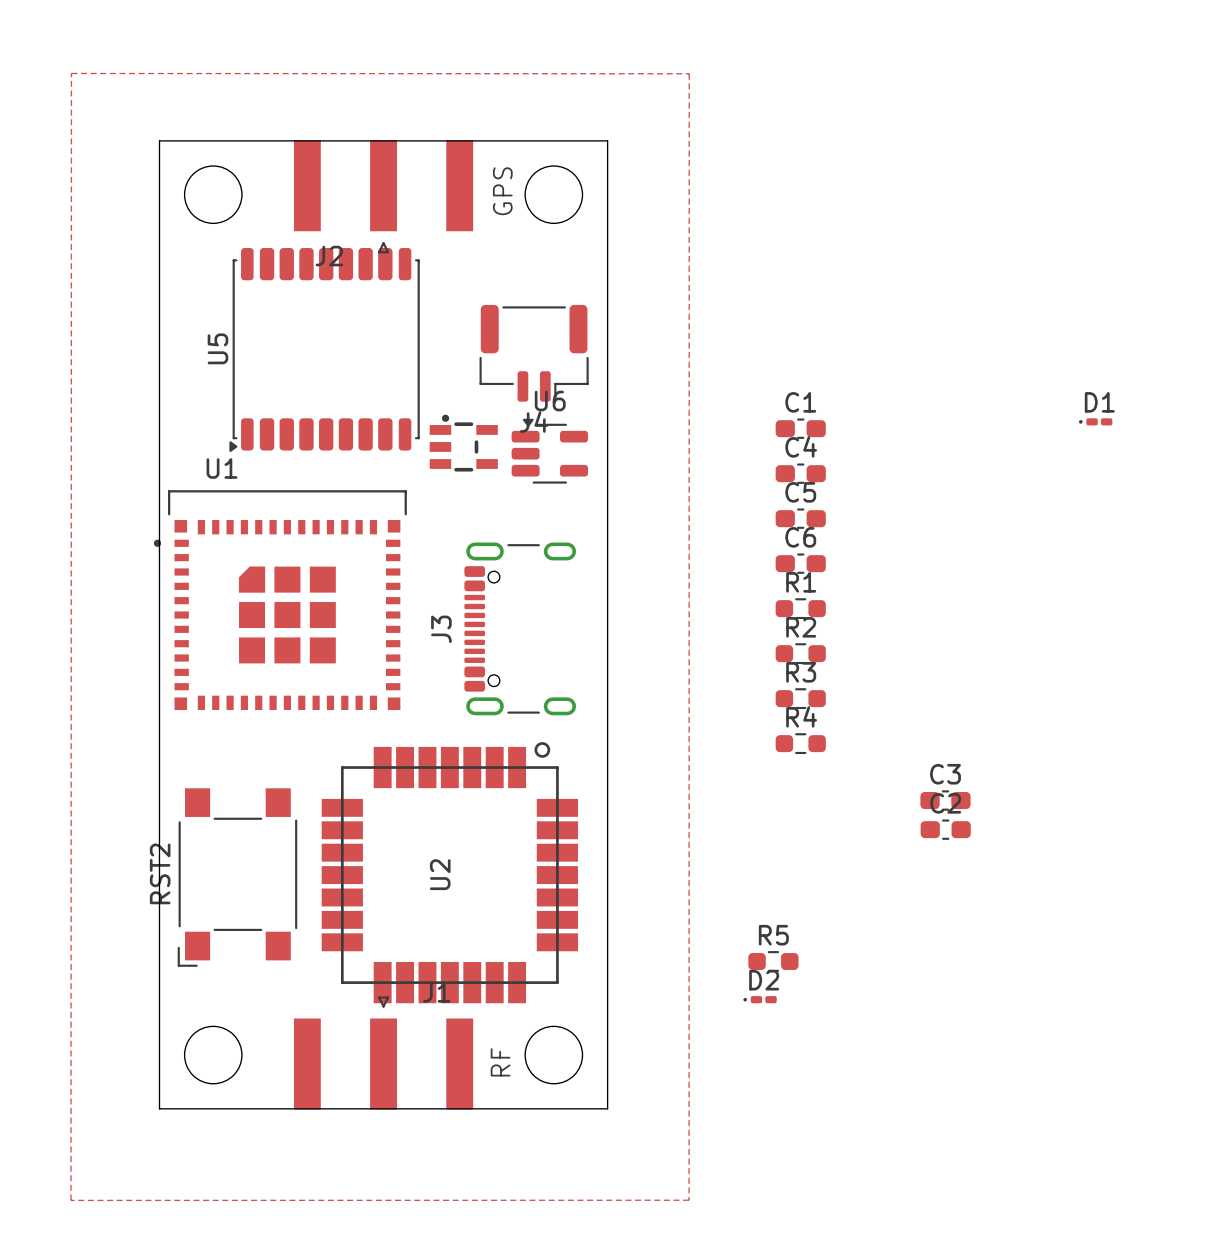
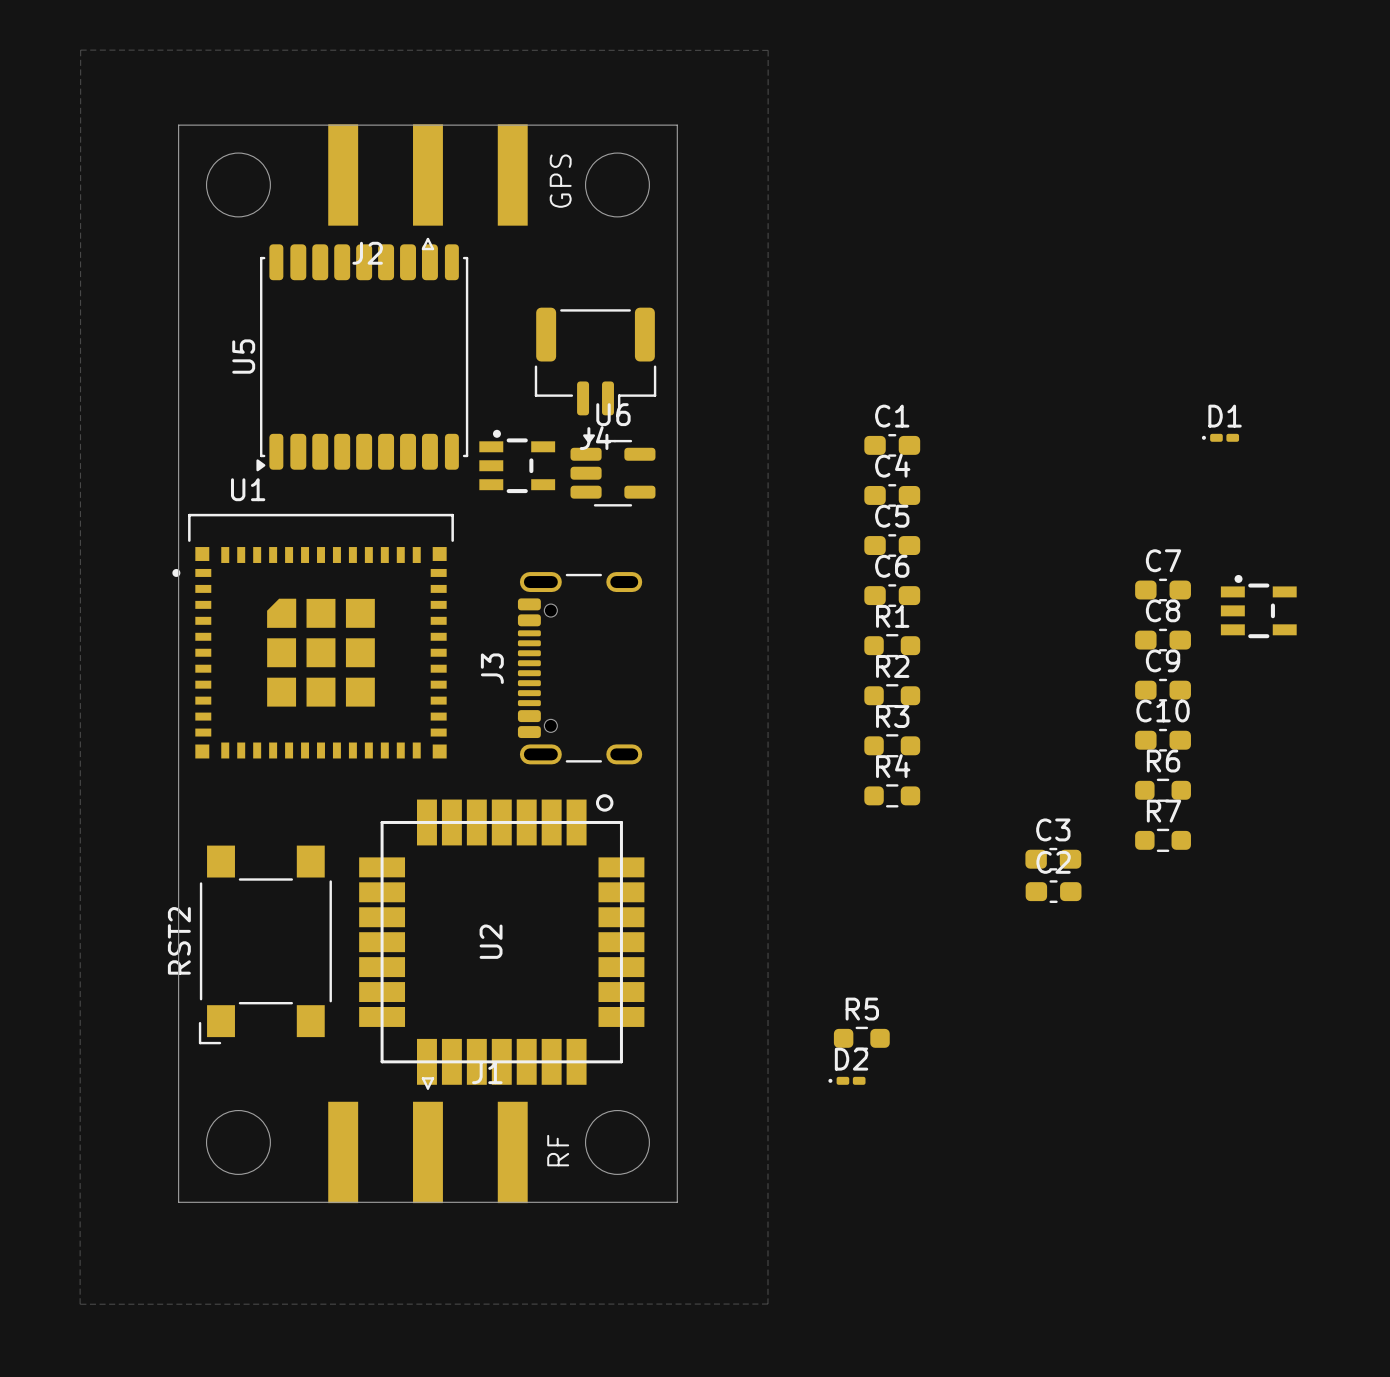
C7: none -> (1163, 590)
part: none -> (1258, 606)
C8: none -> (1163, 640)
C9: none -> (1163, 690)
C10: none -> (1163, 740)
R6: none -> (1163, 790)
R7: none -> (1163, 840)

